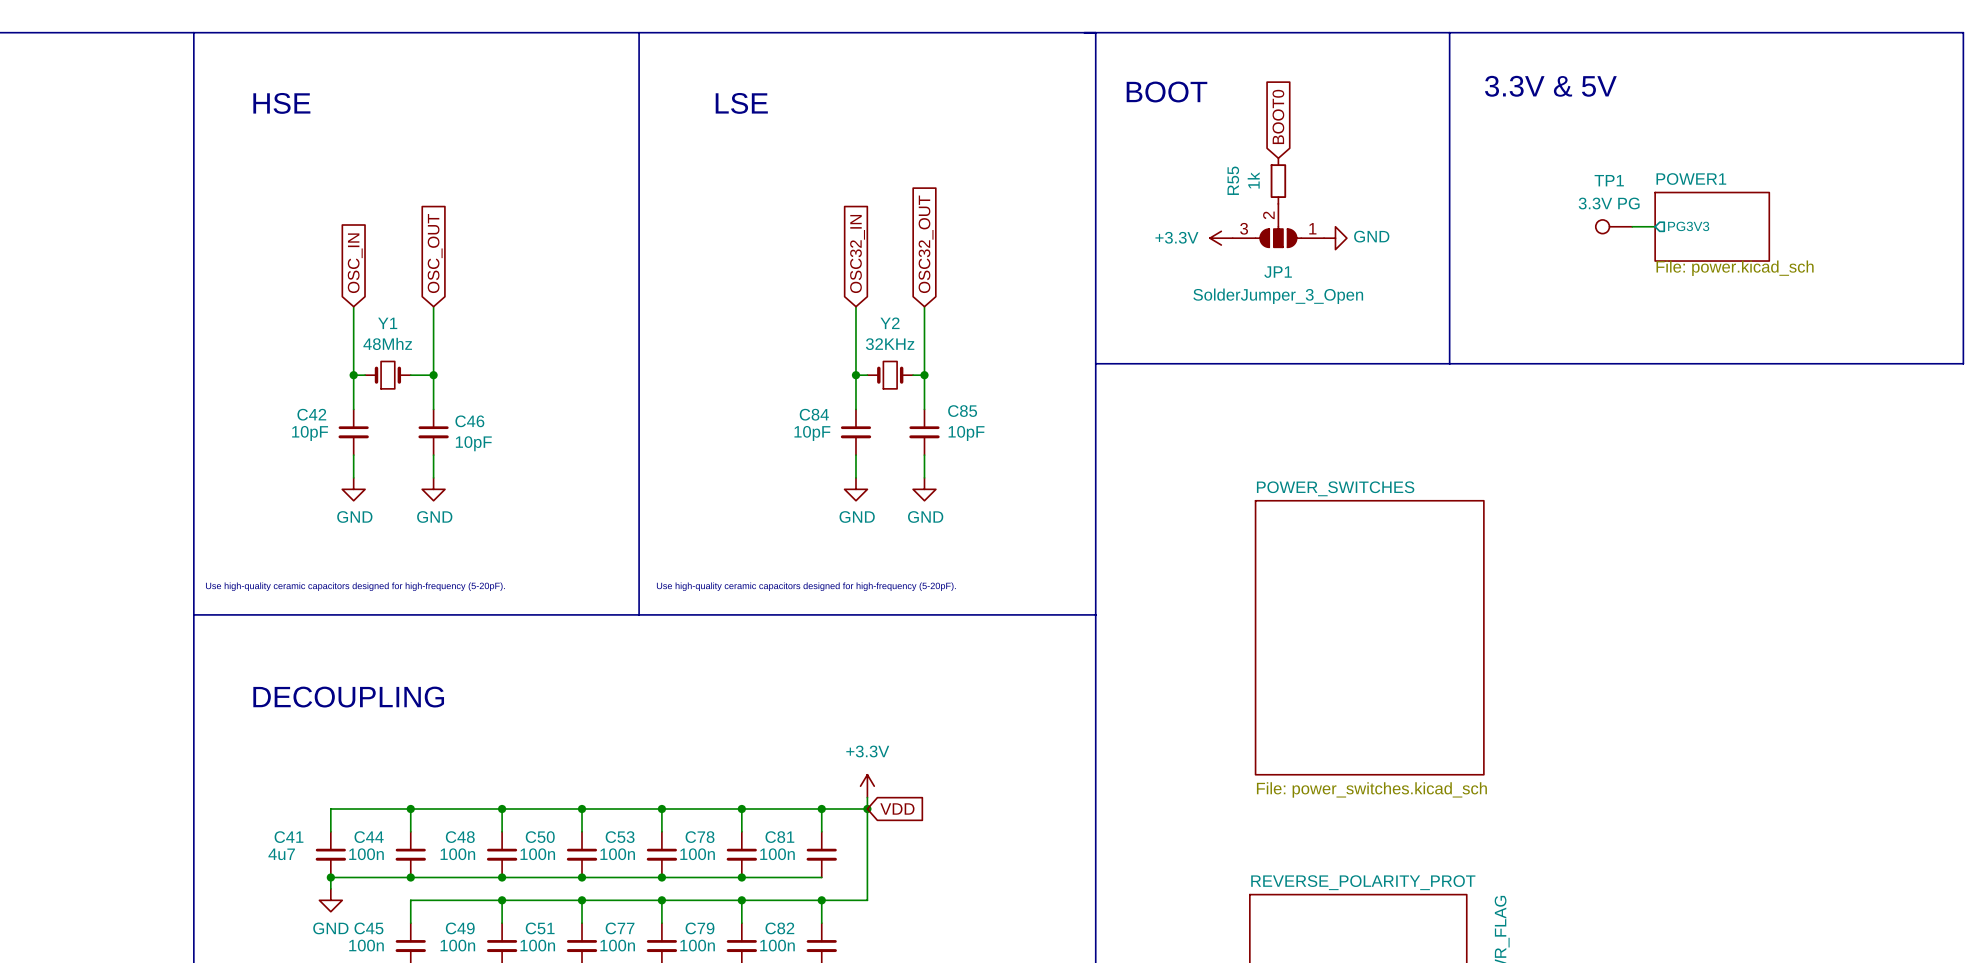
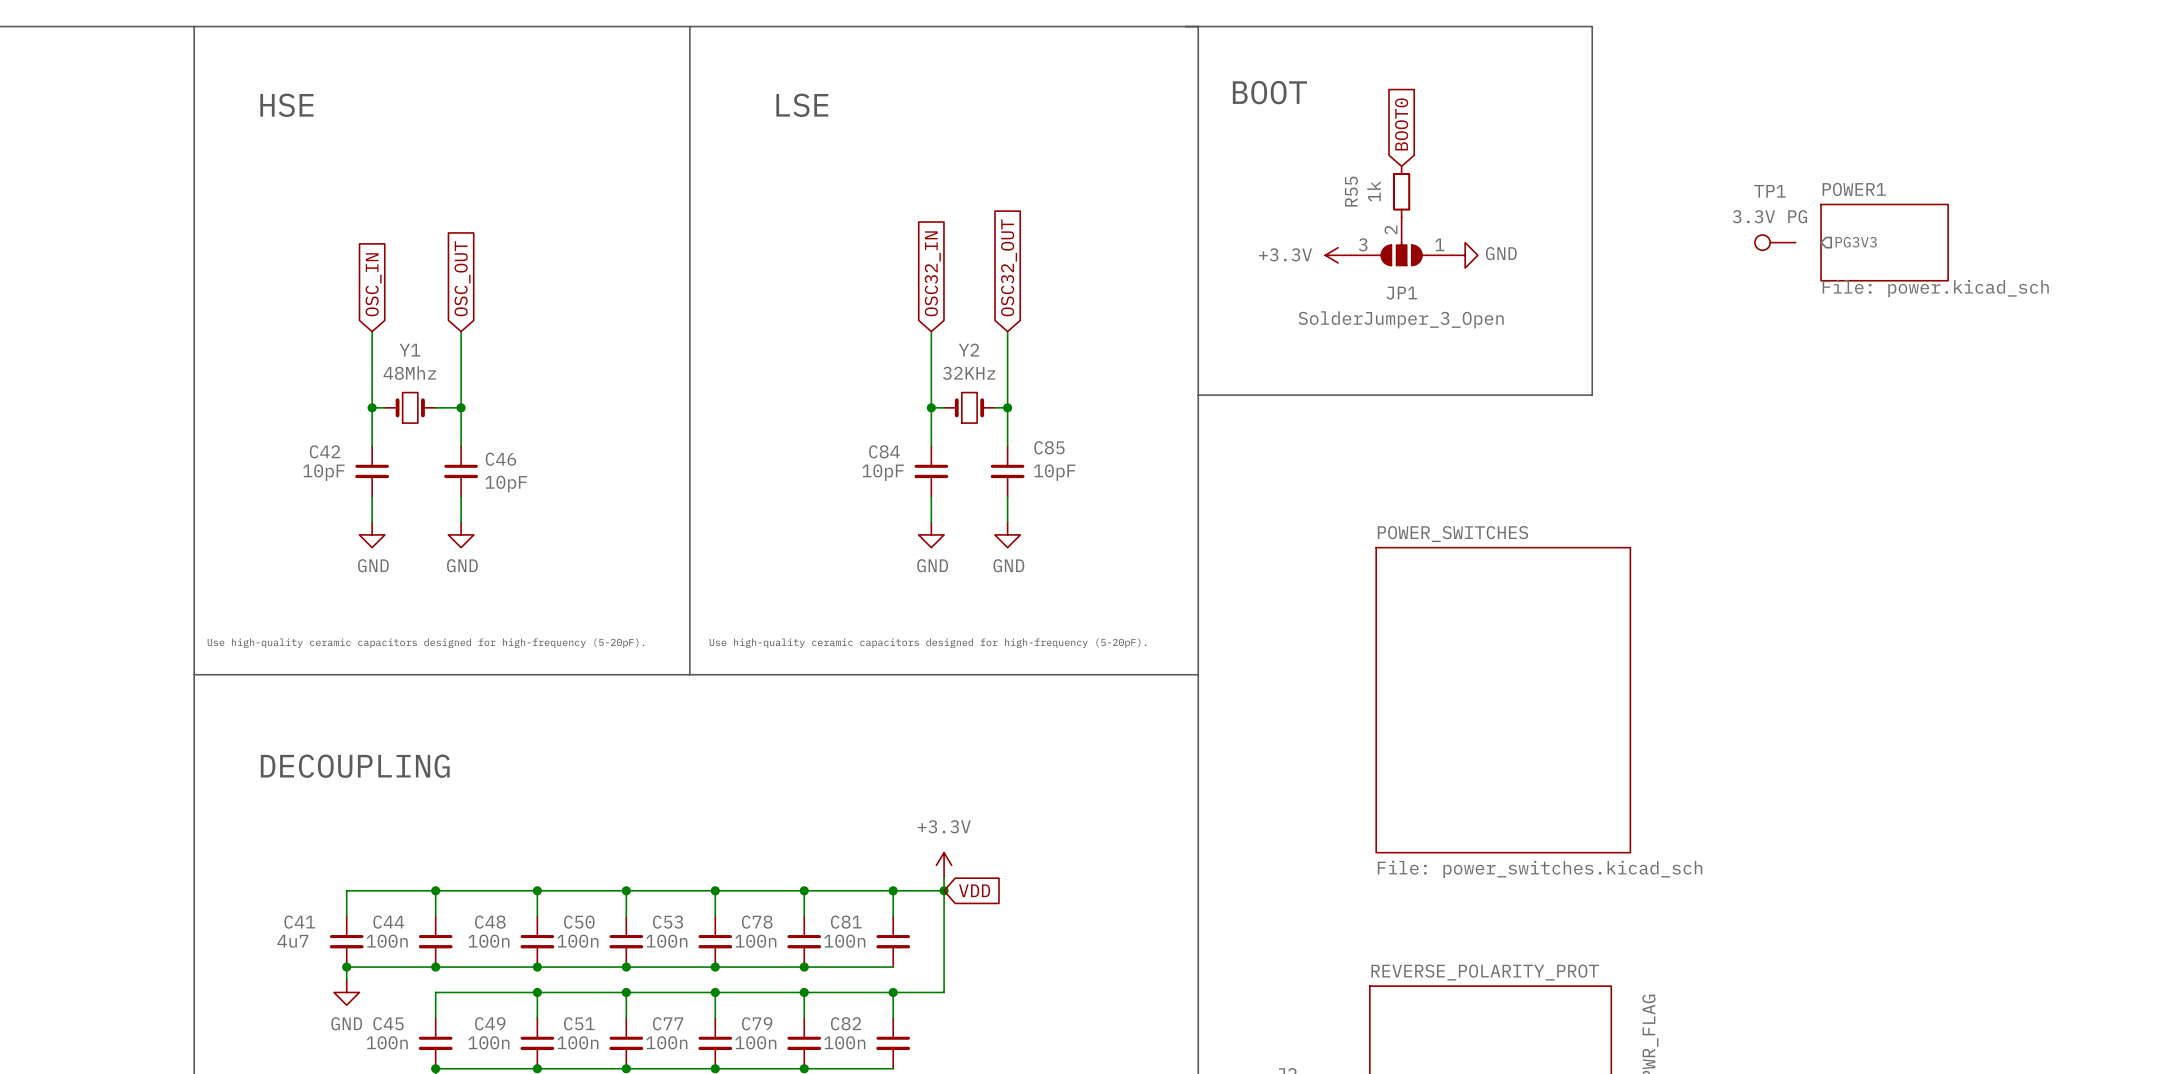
line: (1449, 32) (1963, 32) (1963, 363) (1449, 363) -> none
text: 3.3V & 5V (1550, 86) -> none
wire: (1632, 226) (1655, 226) -> none

